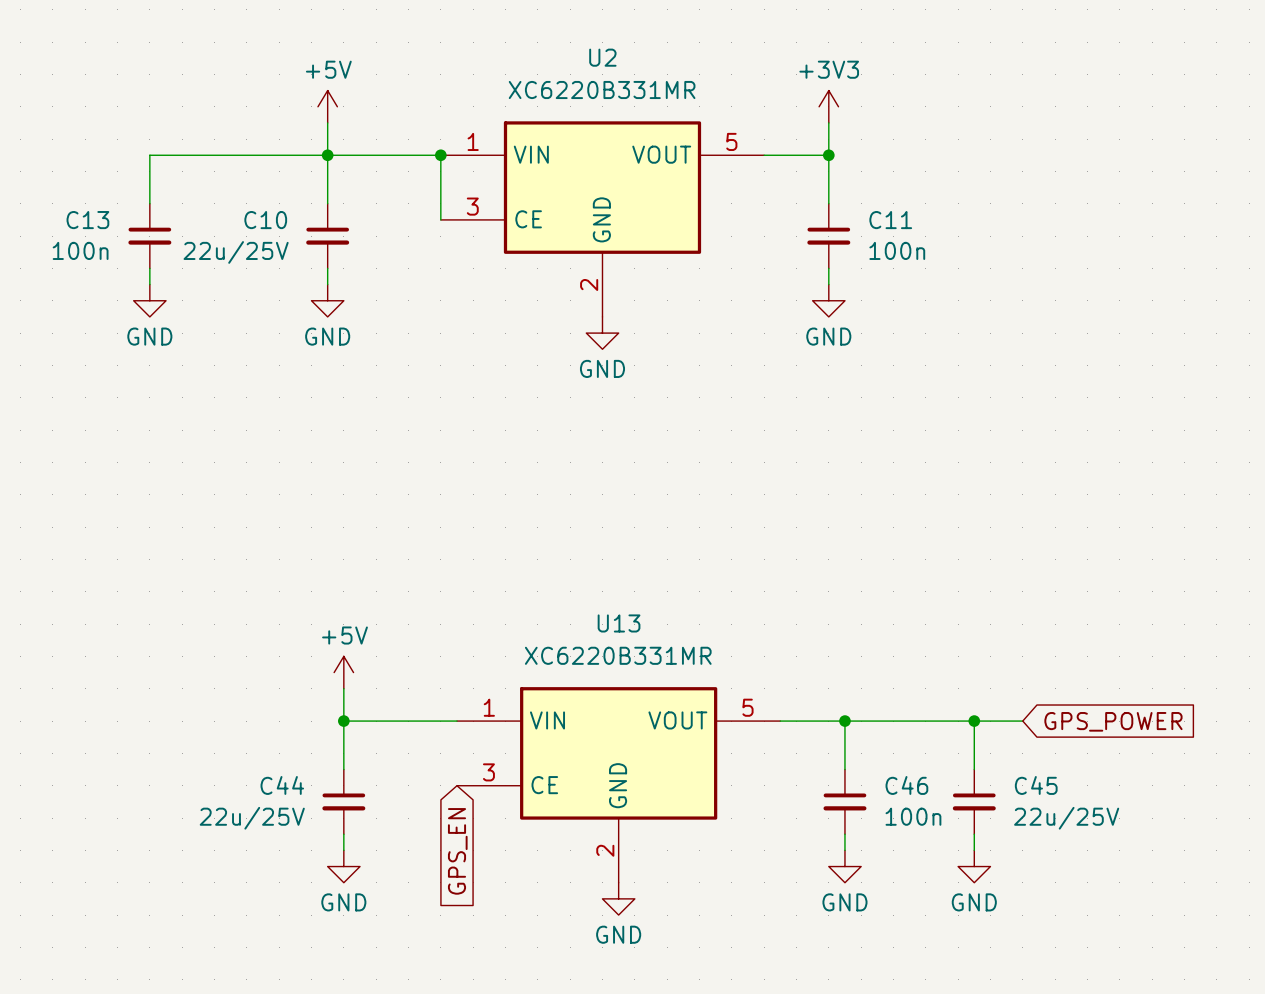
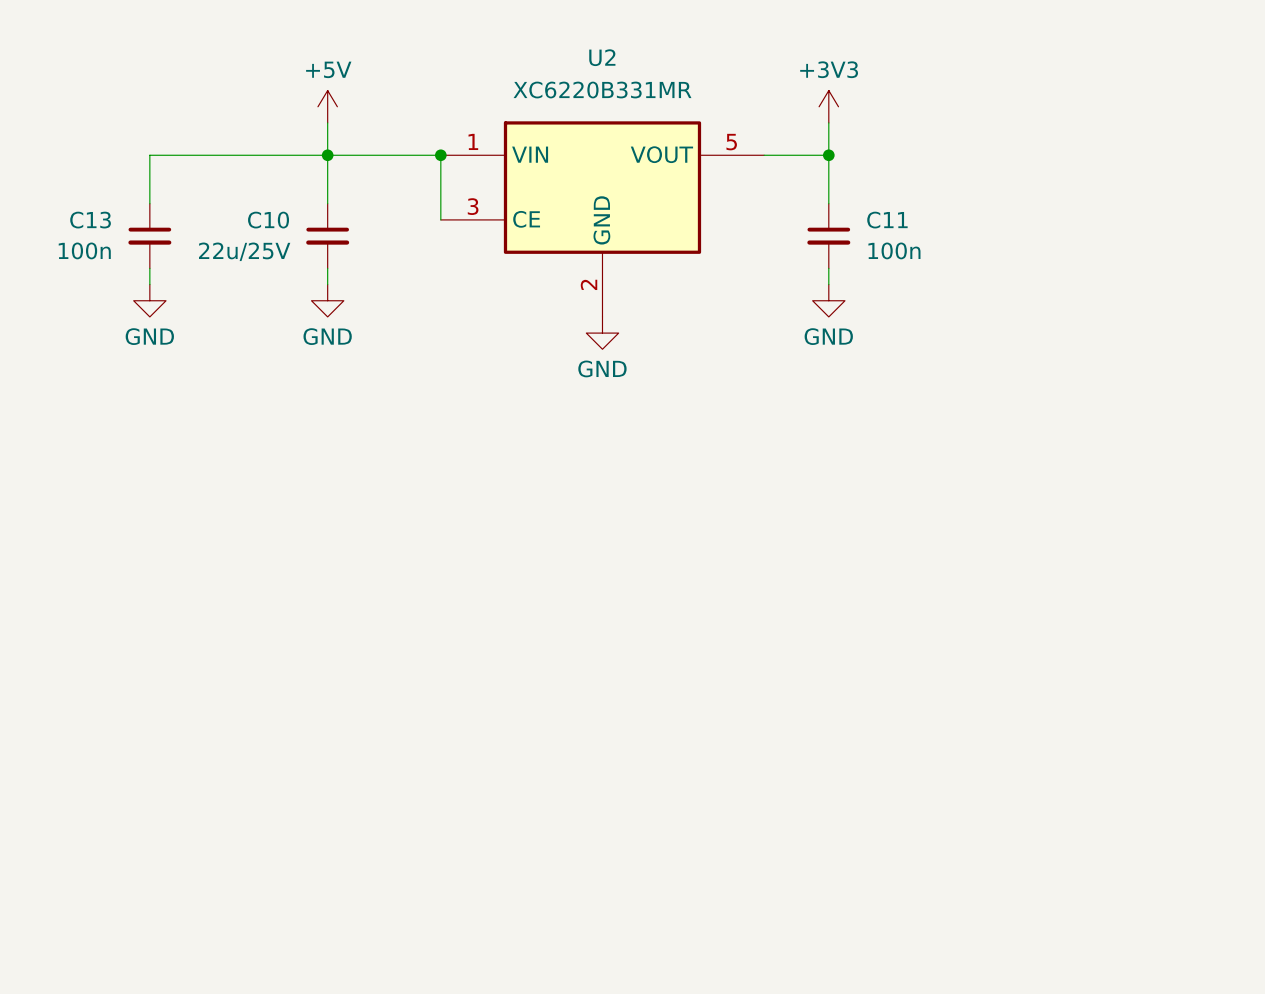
power symbol: +5V (343, 672) -> none
wire: (343, 688) (343, 769) -> none
wire: (343, 721) (457, 721) -> none
junction: (343, 721) -> none
wire: (780, 721) (1022, 721) -> none
wire: (844, 721) (844, 769) -> none
junction: (844, 721) -> none
wire: (974, 721) (974, 769) -> none
junction: (974, 721) -> none
global label: GPS_POWER (1113, 721) -> none
U13: XC6220B331MR (618, 784) -> none
C44: 22u/25V (343, 801) -> none
C46: 100n (844, 801) -> none
C45: 22u/25V (974, 801) -> none
wire: (343, 834) (343, 850) -> none
wire: (844, 834) (844, 850) -> none
wire: (974, 834) (974, 850) -> none
global label: GPS_EN (457, 851) -> none
power symbol: GND (343, 866) -> none
power symbol: GND (844, 866) -> none
power symbol: GND (974, 866) -> none
power symbol: GND (618, 898) -> none

